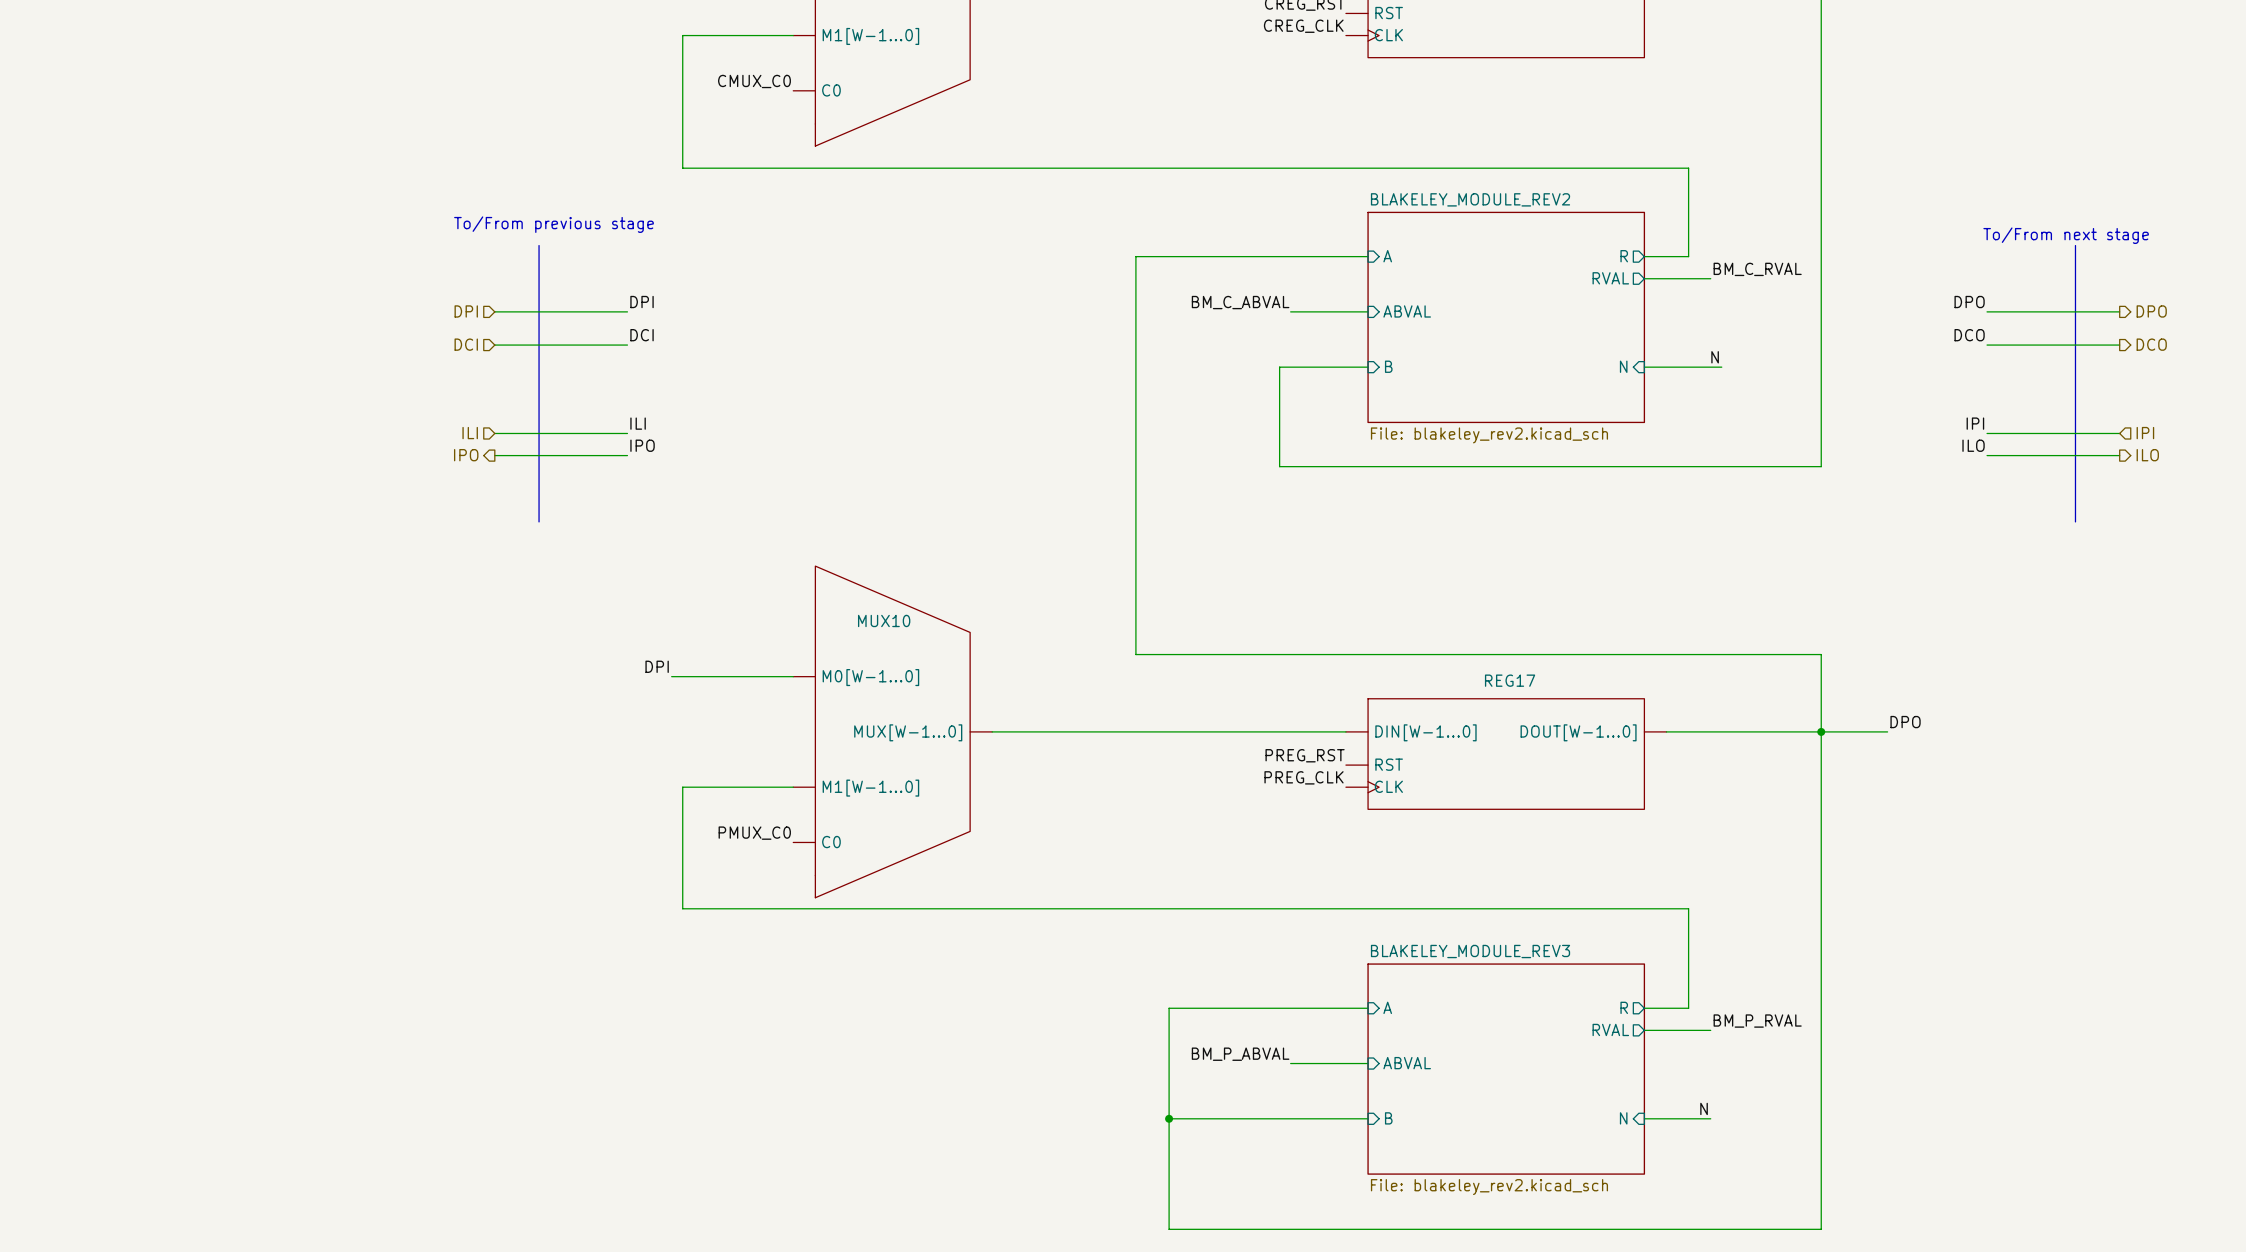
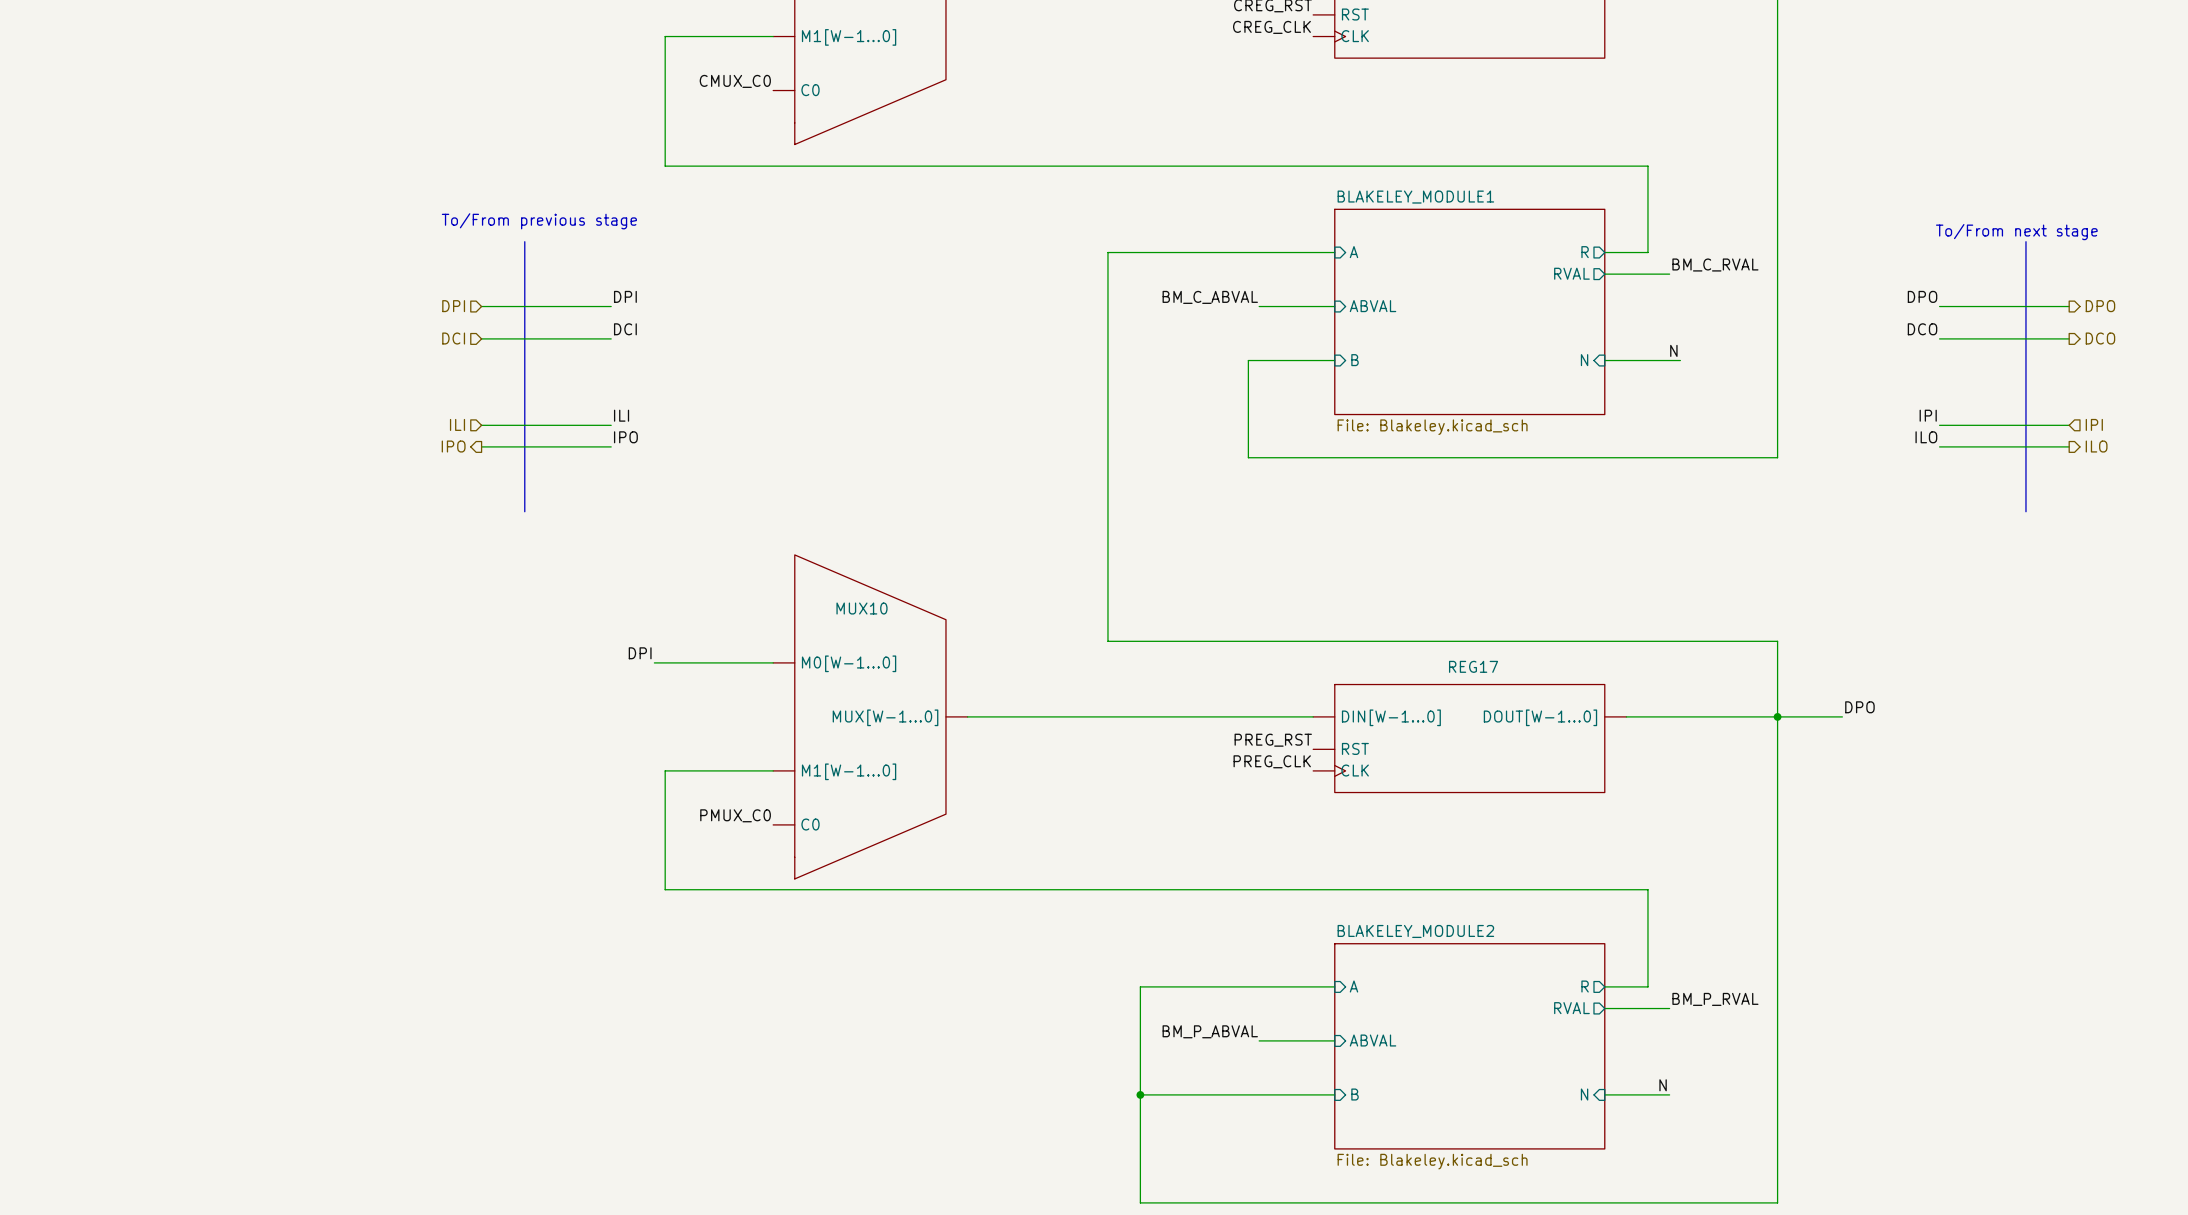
sheet BLAKELEY_MODULE_REV2 name: BLAKELEY_MODULE_REV2 (1470, 199) -> BLAKELEY_MODULE1 (1415, 197)
sheet BLAKELEY_MODULE_REV2 value: File: blakeley_rev2.kicad_sch (1489, 435) -> File: Blakeley.kicad_sch (1432, 427)
sheet BLAKELEY_MODULE_REV3 name: BLAKELEY_MODULE_REV3 (1470, 951) -> BLAKELEY_MODULE2 (1415, 931)
sheet BLAKELEY_MODULE_REV3 value: File: blakeley_rev2.kicad_sch (1489, 1187) -> File: Blakeley.kicad_sch (1432, 1161)

